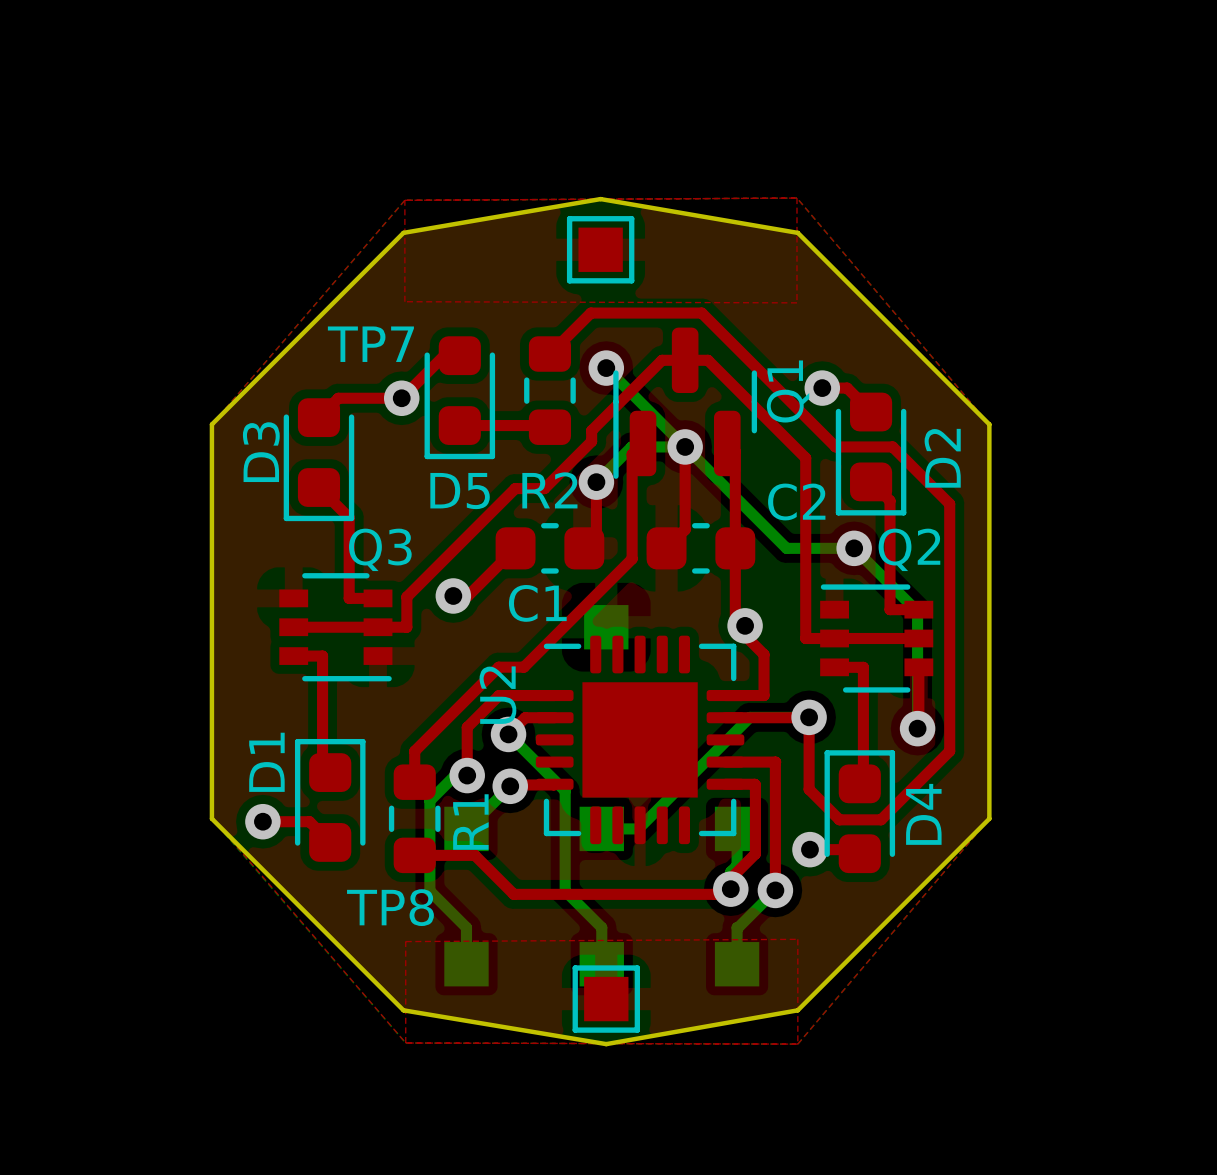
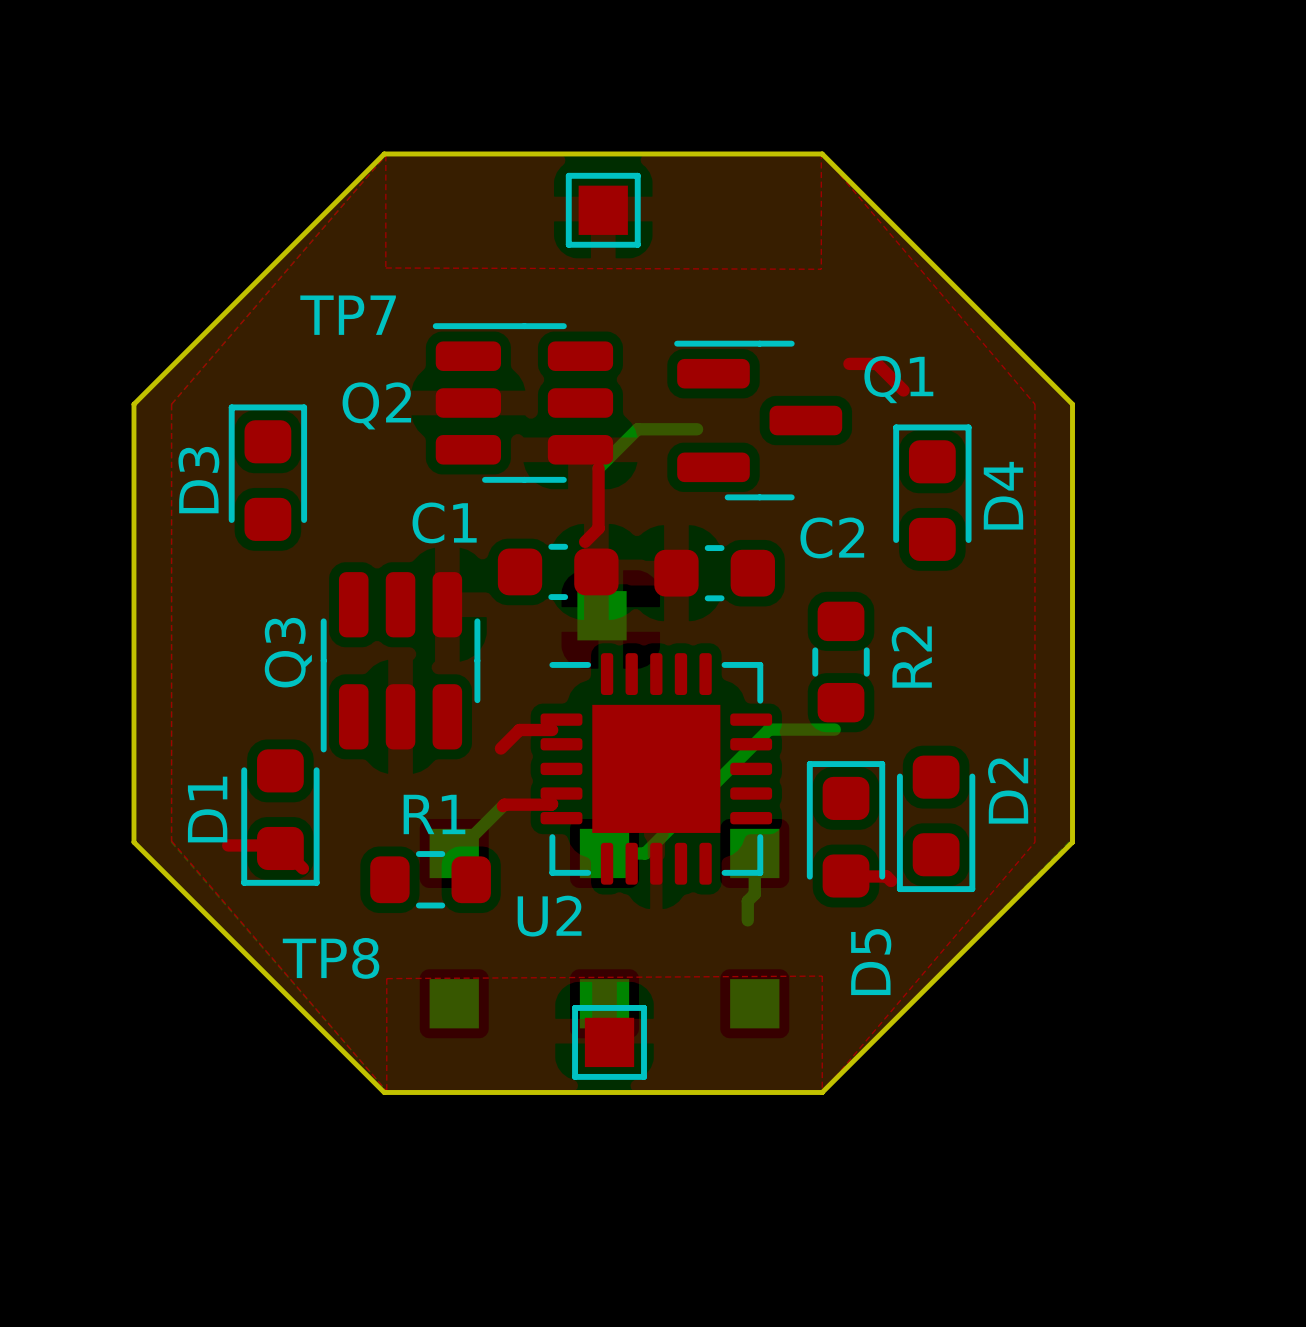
board edge: (600, 199) (403, 232) (211, 424) (211, 818) (403, 1010) (606, 1044) (797, 1010) (989, 818) (989, 424) (797, 232) (600, 199) -> (384, 153) (134, 404) (134, 842) (384, 1092) (822, 1092) (1072, 842) (1072, 404) (822, 153) (384, 153)
top track: (549, 354) (590, 313) (701, 313) (835, 446) (892, 446) (949, 503) (949, 751) (881, 819) (839, 819) (809, 789) (809, 717) -> none
top track: (459, 355) (444, 355) (401, 398) (338, 398) (318, 417) -> none
bottom track: (606, 368) (786, 548) (854, 548) (917, 611) (917, 728) -> none
via: (606, 368) -> none
via: (822, 388) -> none
R2 position: (549, 390) -> (841, 662)
D5 rotation: 0° (459, 397) -> 180° (846, 829)
D5 position: (459, 397) -> (846, 829)
via: (401, 398) -> none
Q1 rotation: 0° (685, 403) -> 90° clockwise (758, 420)
top track: (459, 425) (548, 425) (549, 427) -> none
top track: (643, 443) (632, 454) (632, 558) (523, 667) (498, 667) (414, 751) (414, 782) -> none
top track: (727, 443) (735, 451) (735, 625) -> none
top track: (685, 446) (685, 529) (666, 548) -> none
via: (685, 446) -> none
D2 position: (871, 454) -> (936, 823)
D2 name position: D2 (942, 458) -> D2 (1008, 790)
D3 rotation: 0° (318, 459) -> 180° (267, 472)
top track: (871, 481) (890, 500) (890, 609) (918, 609) -> none
via: (596, 482) -> none
top track: (318, 487) (349, 517) (349, 598) (378, 598) -> none
R2 name rotation: 0° (549, 490) -> 90° counterclockwise (911, 657)
R2 name position: R2 (549, 490) -> R2 (911, 657)
C2 name position: C2 (796, 501) -> C2 (832, 537)
top track: (515, 548) (467, 595) (453, 595) -> none
C1 position: (549, 548) -> (558, 571)
C2 position: (700, 548) -> (714, 573)
via: (854, 548) -> none
Q3 name position: Q3 (380, 549) -> Q3 (288, 652)
Q2 name position: Q2 (909, 549) -> Q2 (376, 405)
Q3 footprint: [279, 573, 393, 682] -> [320, 572, 481, 753]
Q2 footprint: [820, 584, 934, 693] -> [432, 323, 614, 483]
via: (453, 595) -> none
C1 name position: C1 (537, 603) -> C1 (444, 522)
top track: (735, 625) (764, 654) (764, 695) (725, 695) -> none
via: (745, 625) -> none
top track: (293, 627) (406, 627) (406, 596) (515, 488) (544, 488) (591, 441) (591, 430) (662, 360) (707, 360) (805, 458) (805, 638) (918, 638) -> none
part position: (606, 627) -> (602, 615)
top track: (293, 656) (322, 656) (322, 764) (330, 772) -> none
top track: (834, 667) (863, 667) (863, 780) (859, 783) -> none
top track: (918, 667) (917, 728) -> none
U2 name rotation: 0° (497, 695) -> 90° clockwise (549, 916)
U2 name position: U2 (497, 695) -> U2 (549, 916)
top track: (554, 695) (499, 695) (467, 727) (467, 775) -> none
top track: (725, 717) (808, 717) -> none
via: (809, 717) -> none
via: (917, 728) -> none
bottom track: (508, 734) (565, 791) (565, 891) (601, 927) (601, 964) -> none
via: (508, 734) -> none
U2 position: (640, 739) -> (656, 768)
top track: (725, 762) (775, 762) -> none
top track: (775, 762) (775, 890) -> none
bottom track: (467, 775) (455, 775) (429, 800) (429, 891) (466, 927) (466, 964) -> none
via: (467, 775) -> none
top track: (725, 784) (755, 784) (755, 853) (714, 894) (513, 894) (474, 855) (414, 855) -> none
via: (510, 786) -> none
D1 rotation: 0° (330, 800) -> 180° (280, 817)
D4 position: (859, 811) -> (932, 492)
R1 rotation: 0° (414, 818) -> 90° clockwise (430, 879)
via: (262, 821) -> none
via: (809, 849) -> none
via: (730, 889) -> none
bottom track: (775, 890) (737, 927) (737, 964) -> none
via: (775, 890) -> none
TP8 name position: TP8 (390, 907) -> TP8 (331, 958)

